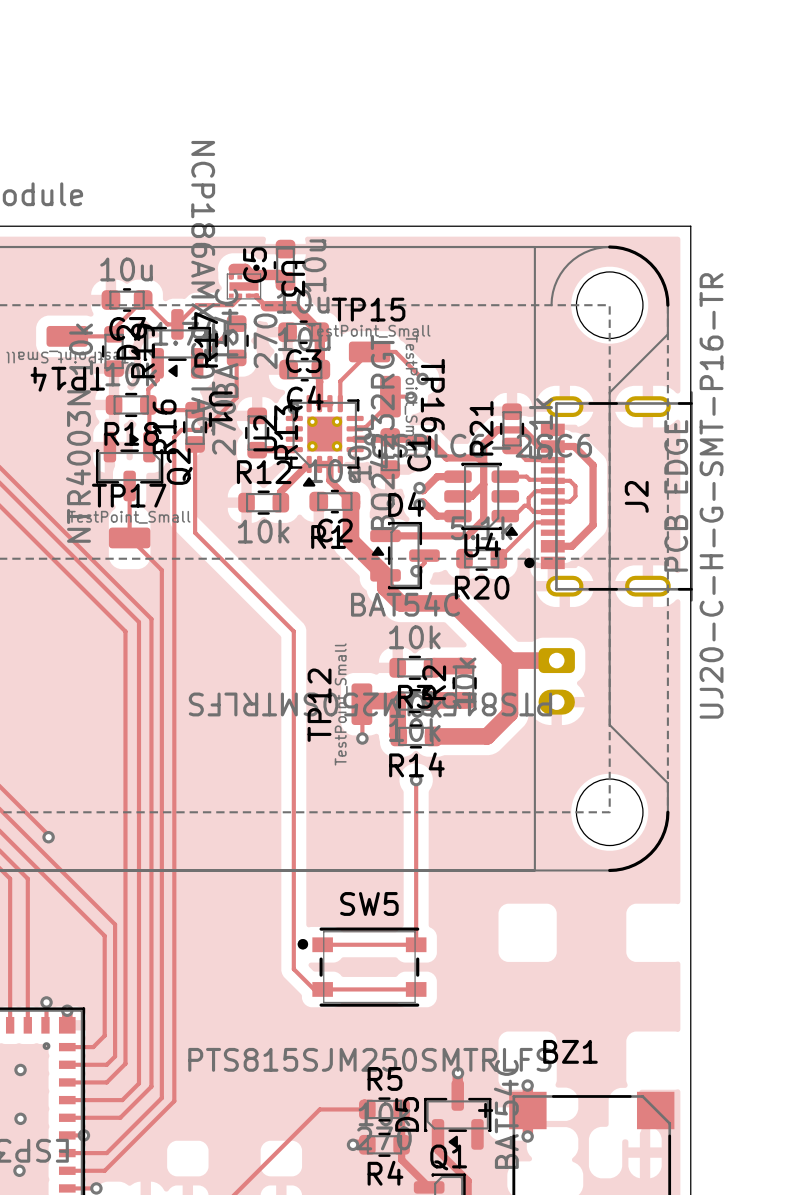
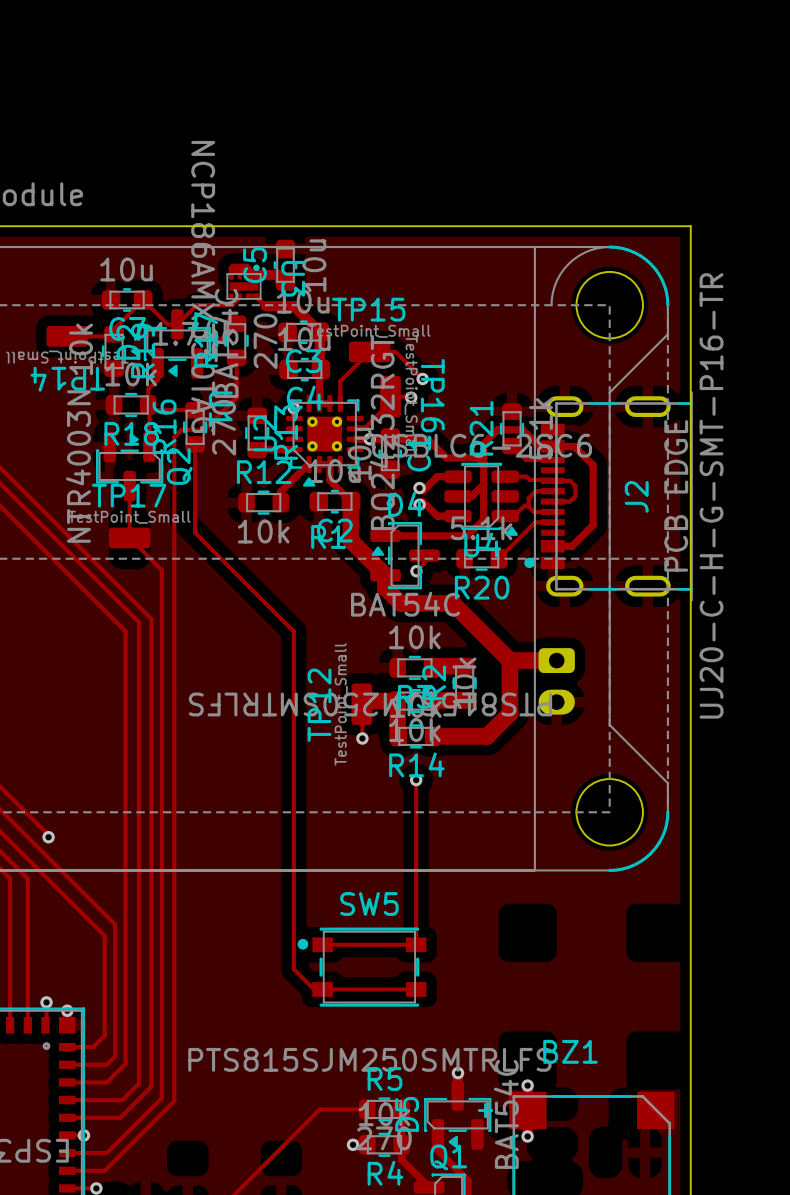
via: (20, 1069) -> none
via: (20, 1118) -> none
via: (19, 1170) -> none

